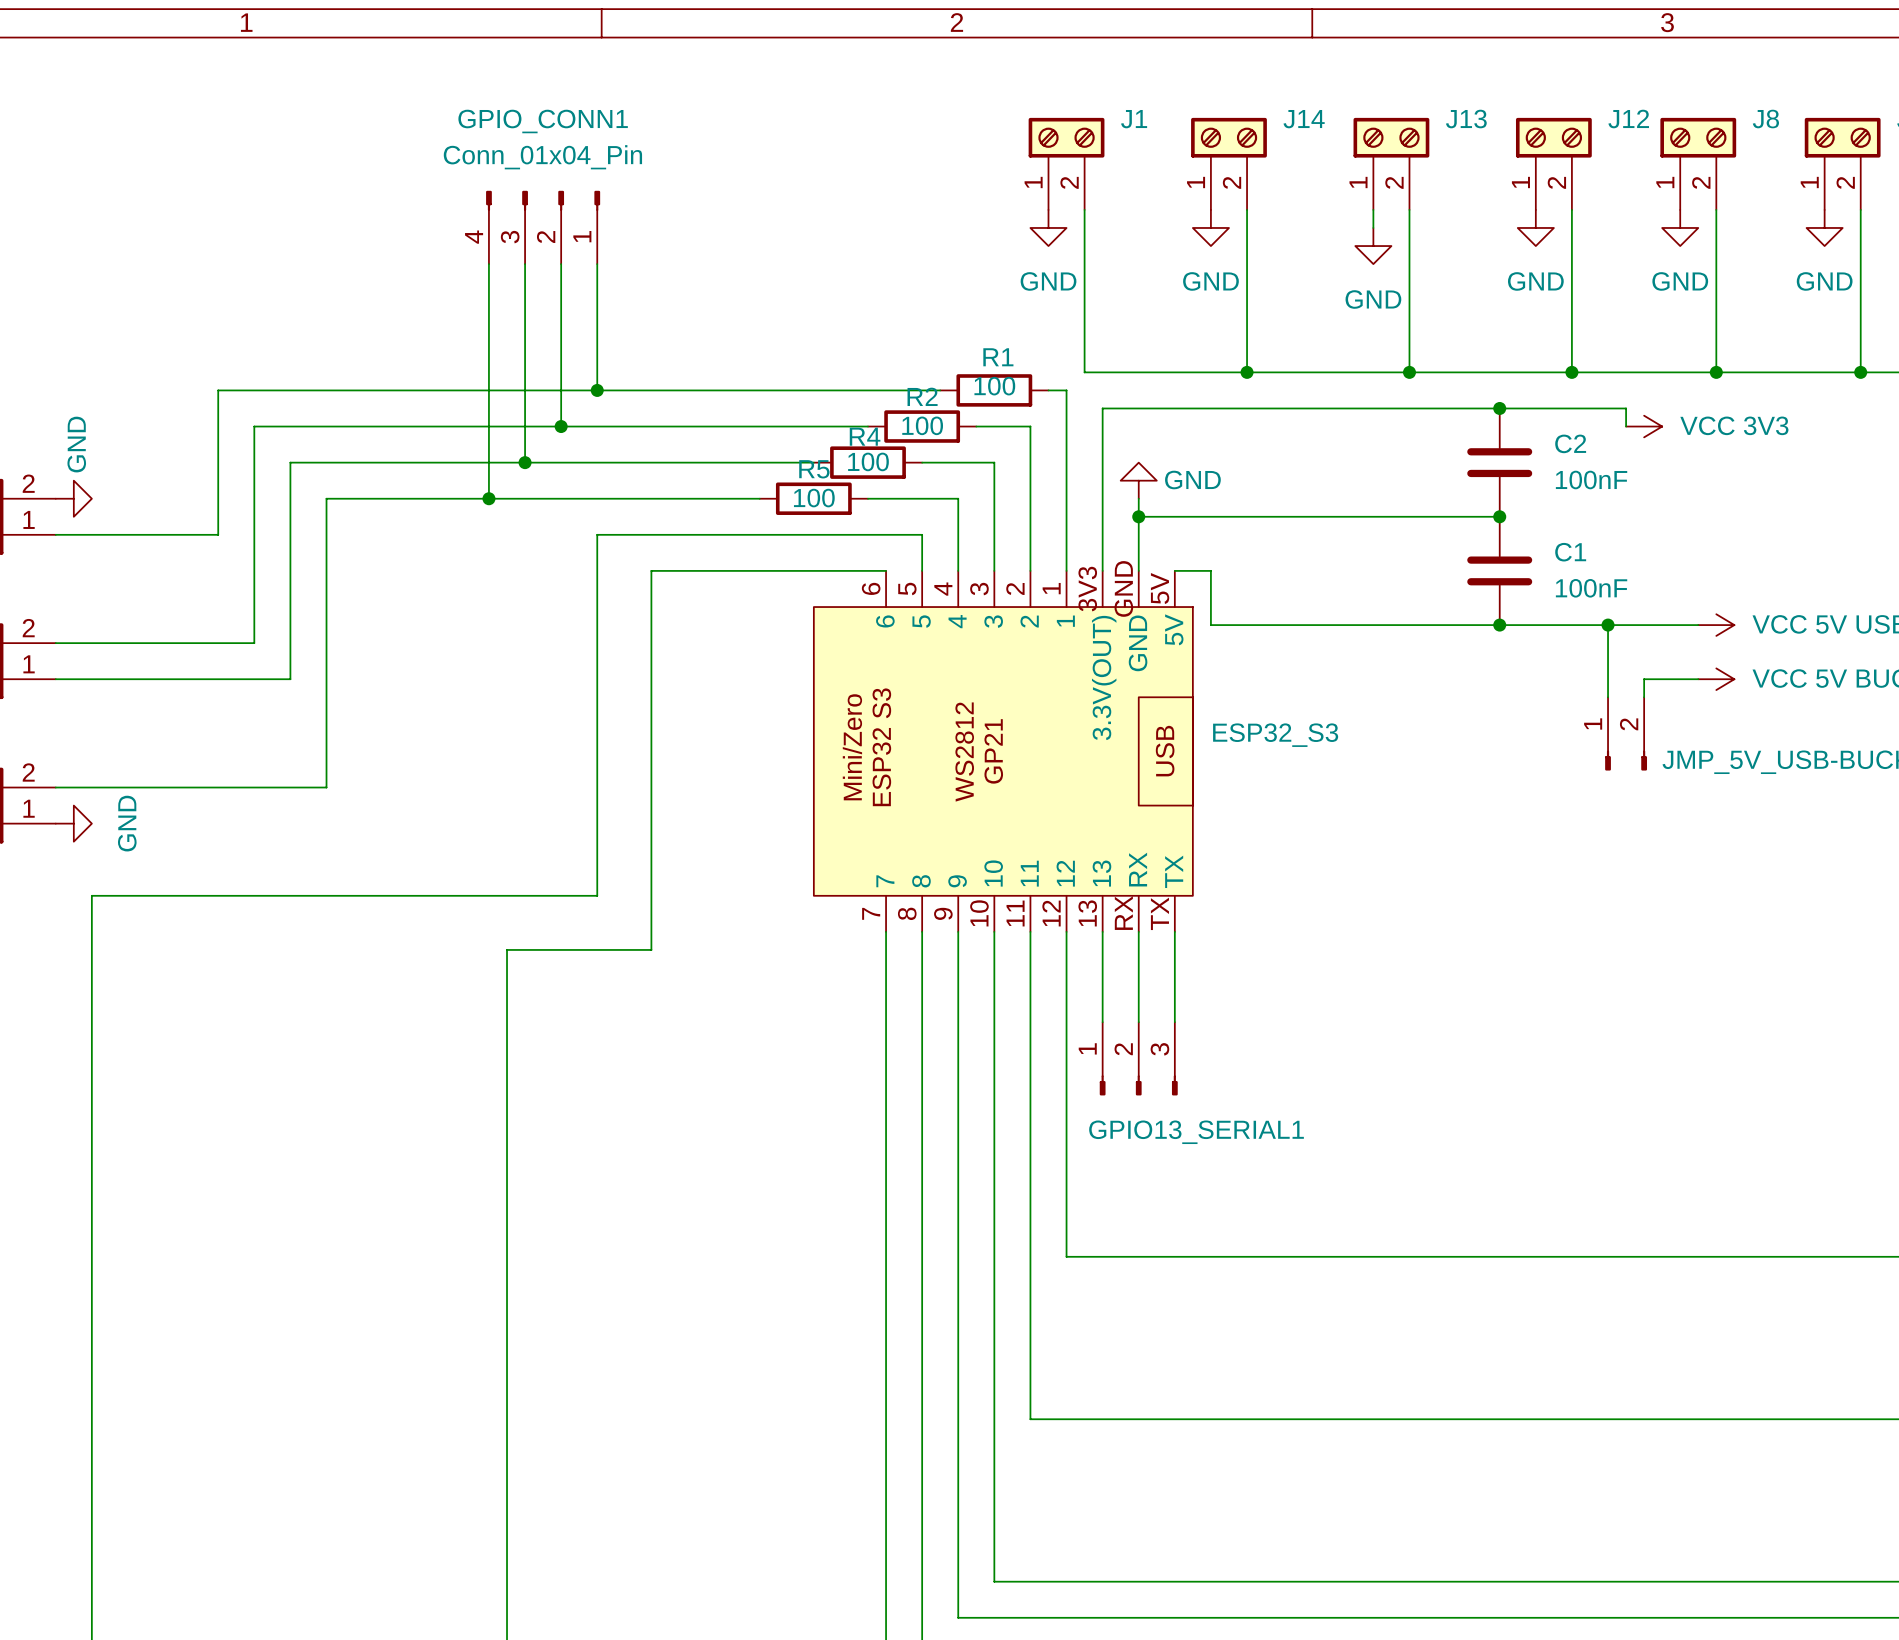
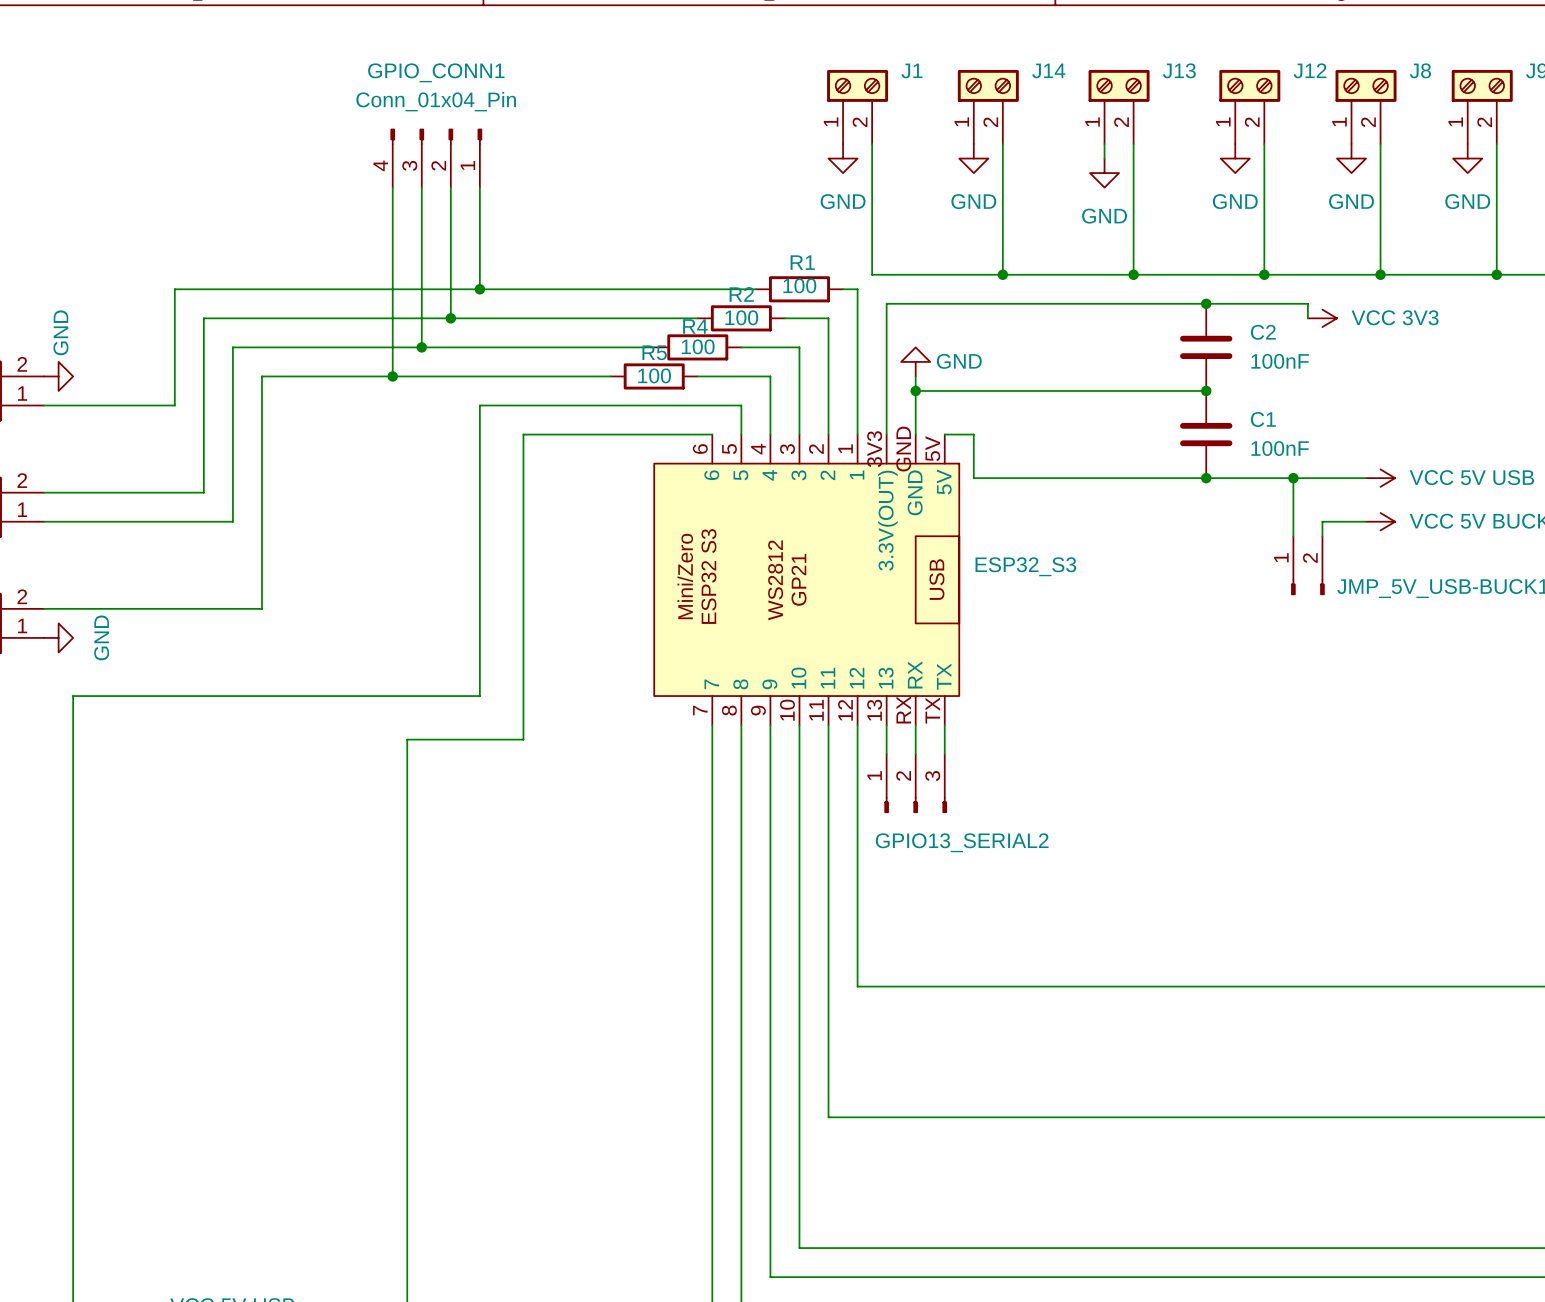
GPIO13_SERIAL2: none -> (915, 783)
GPIO13_SERIAL1: (1138, 1058) -> none

